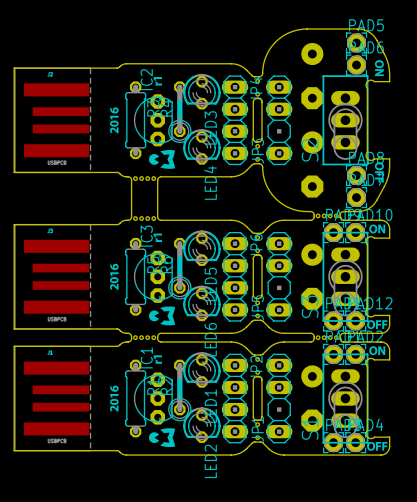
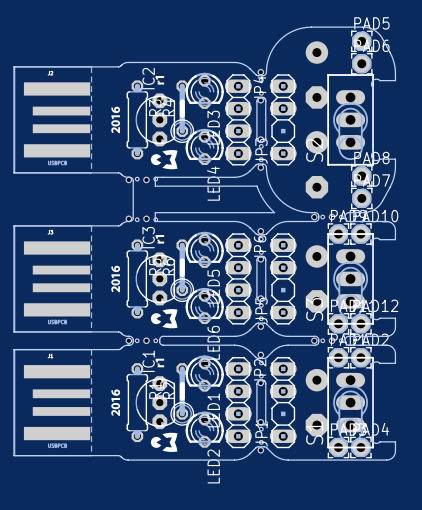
drawing: [374, 60, 384, 77] -> none
hole: none -> (260, 72)
hole: none -> (260, 100)
hole: none -> (260, 139)
drawing: [374, 162, 384, 183] -> none
hole: none -> (260, 167)
board edge: (161, 176) (157, 180) (157, 217) (161, 220) -> (163, 177) (155, 177) (155, 186) (256, 186) (264, 200) (274, 212) (155, 212) (155, 221) (163, 221)
hole: (141, 178) -> none
hole: (147, 178) -> none
hole: none -> (128, 179)
hole: none -> (146, 179)
hole: none -> (314, 217)
hole: (324, 215) -> none
hole: none -> (332, 217)
hole: (330, 215) -> none
hole: none -> (128, 218)
hole: none -> (146, 218)
hole: (141, 218) -> none
hole: (147, 218) -> none
drawing: [369, 224, 386, 234] -> none
hole: none -> (260, 231)
hole: none -> (260, 259)
hole: none -> (260, 298)
drawing: [366, 320, 388, 330] -> none
hole: none -> (260, 326)
hole: none -> (128, 340)
hole: (141, 337) -> none
hole: none -> (146, 340)
hole: (147, 337) -> none
hole: none -> (314, 340)
hole: (324, 337) -> none
hole: none -> (332, 340)
hole: (330, 337) -> none
drawing: [369, 346, 386, 356] -> none
hole: none -> (260, 354)
hole: none -> (260, 382)
hole: none -> (260, 422)
drawing: [366, 441, 388, 451] -> none
hole: none -> (260, 450)

